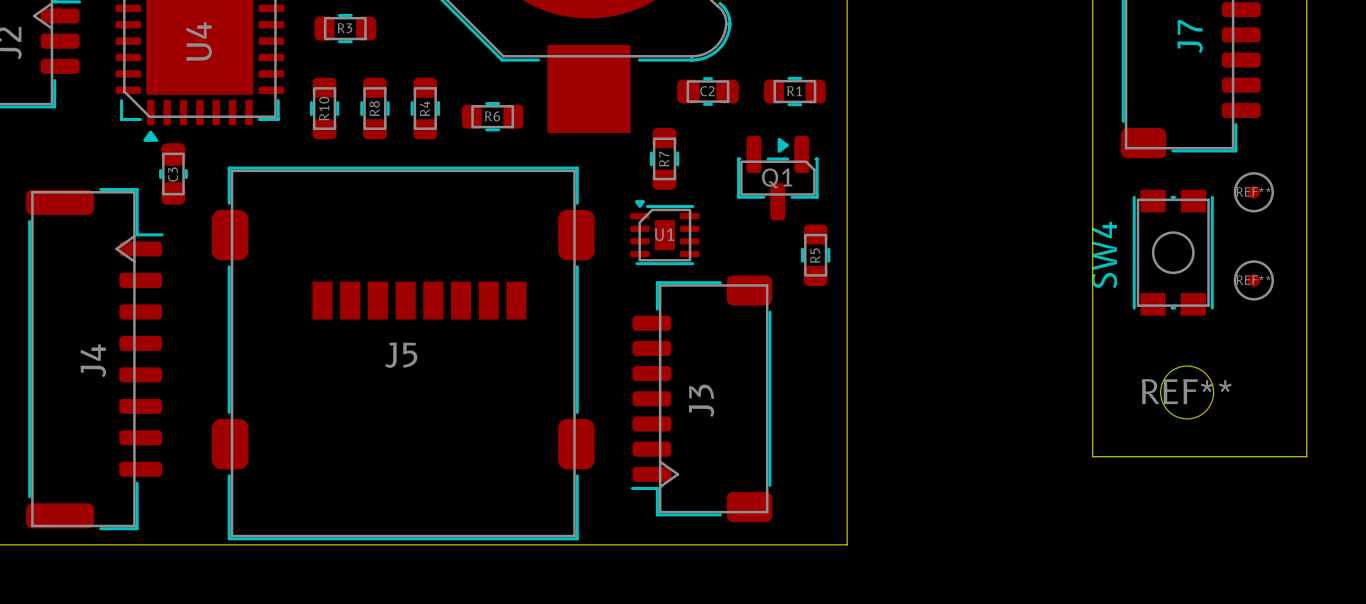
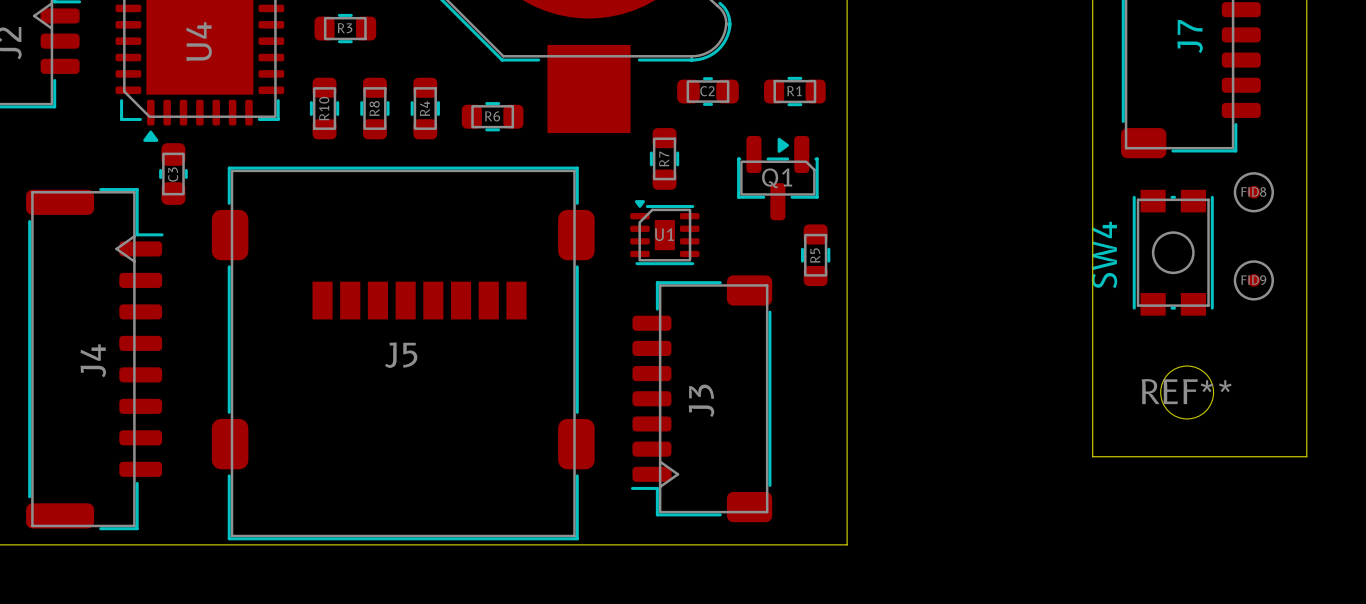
REF** name: REF** (1253, 191) -> FID8 (1253, 191)
REF** name: REF** (1253, 280) -> FID9 (1253, 280)

